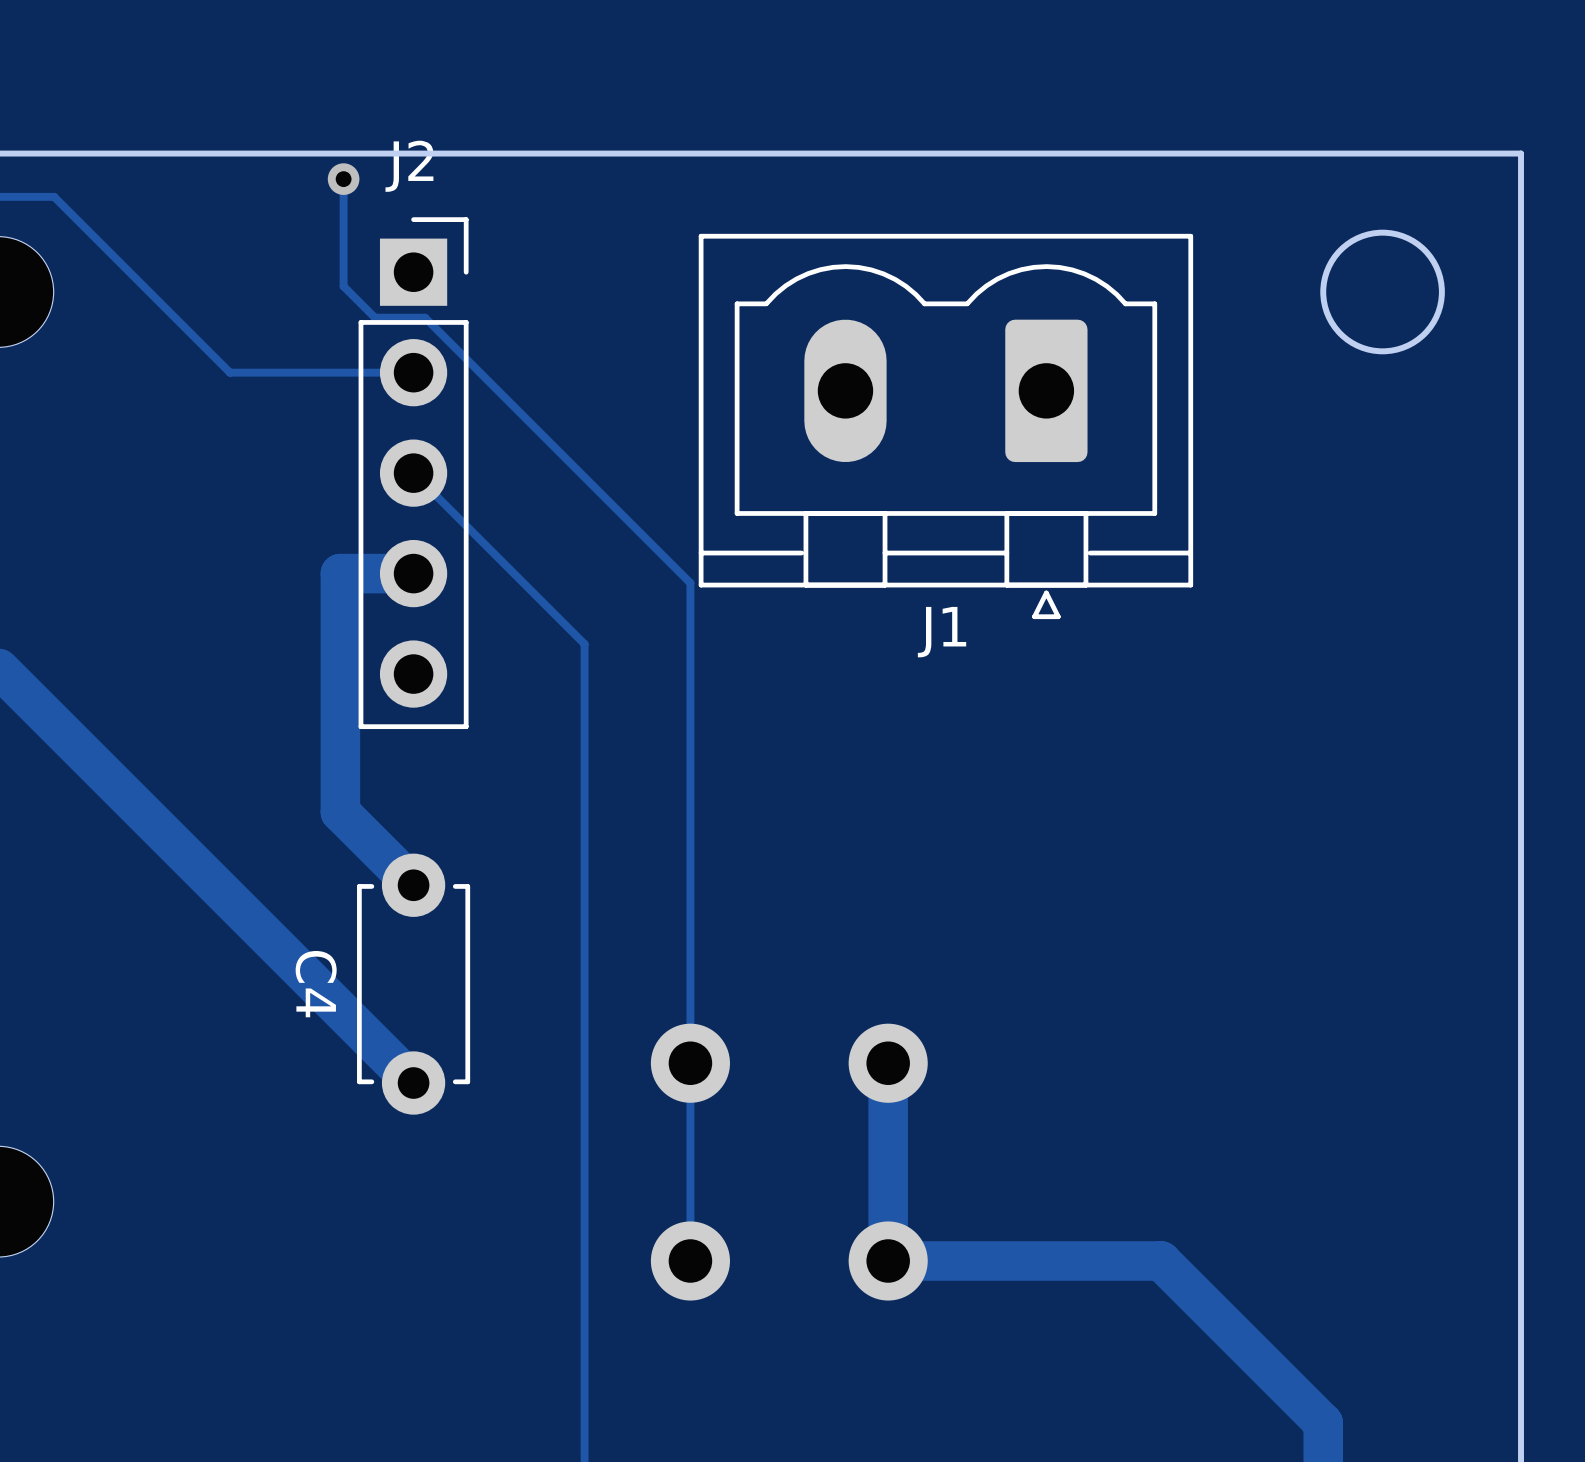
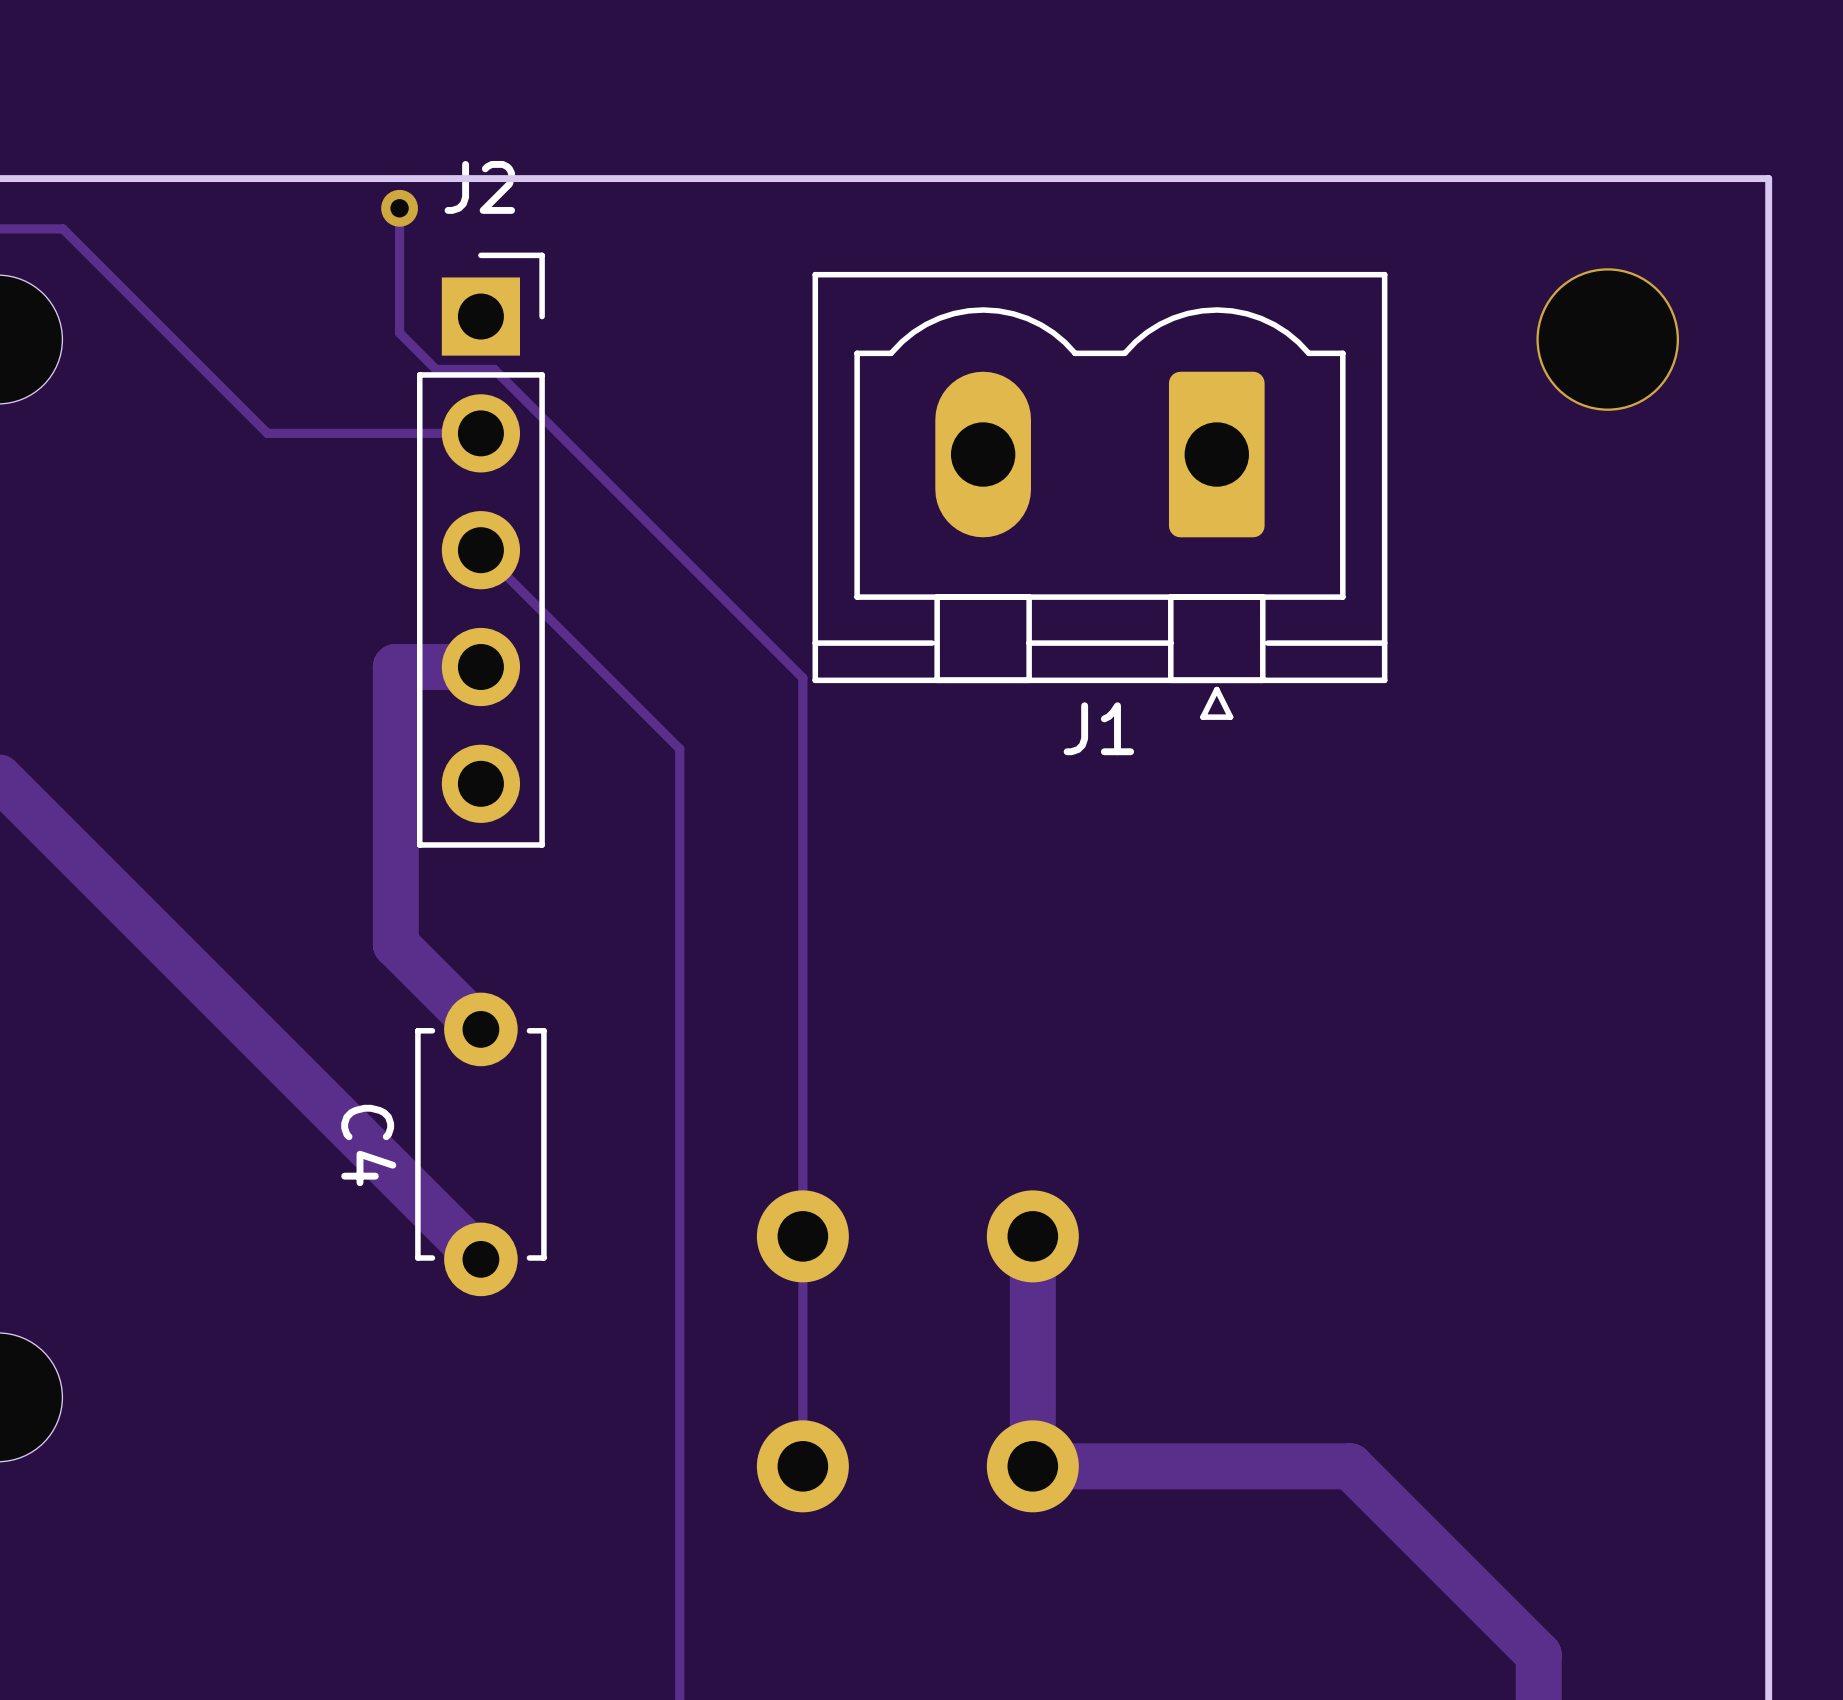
round board edge: [1320, 229, 1445, 355] -> none
via: none -> (1607, 339)

